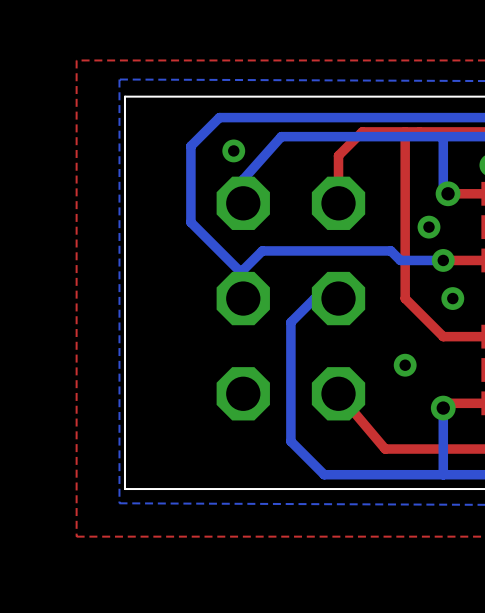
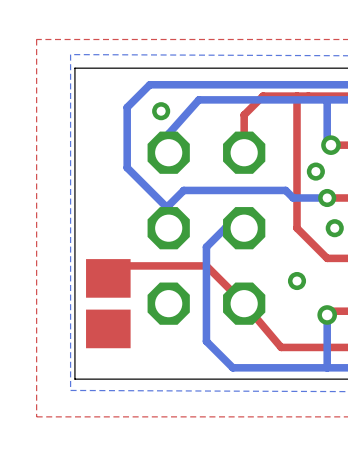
top track: none -> (108, 278) (108, 284) (127, 265) (206, 265) (244, 303)
part: none -> (108, 303)

